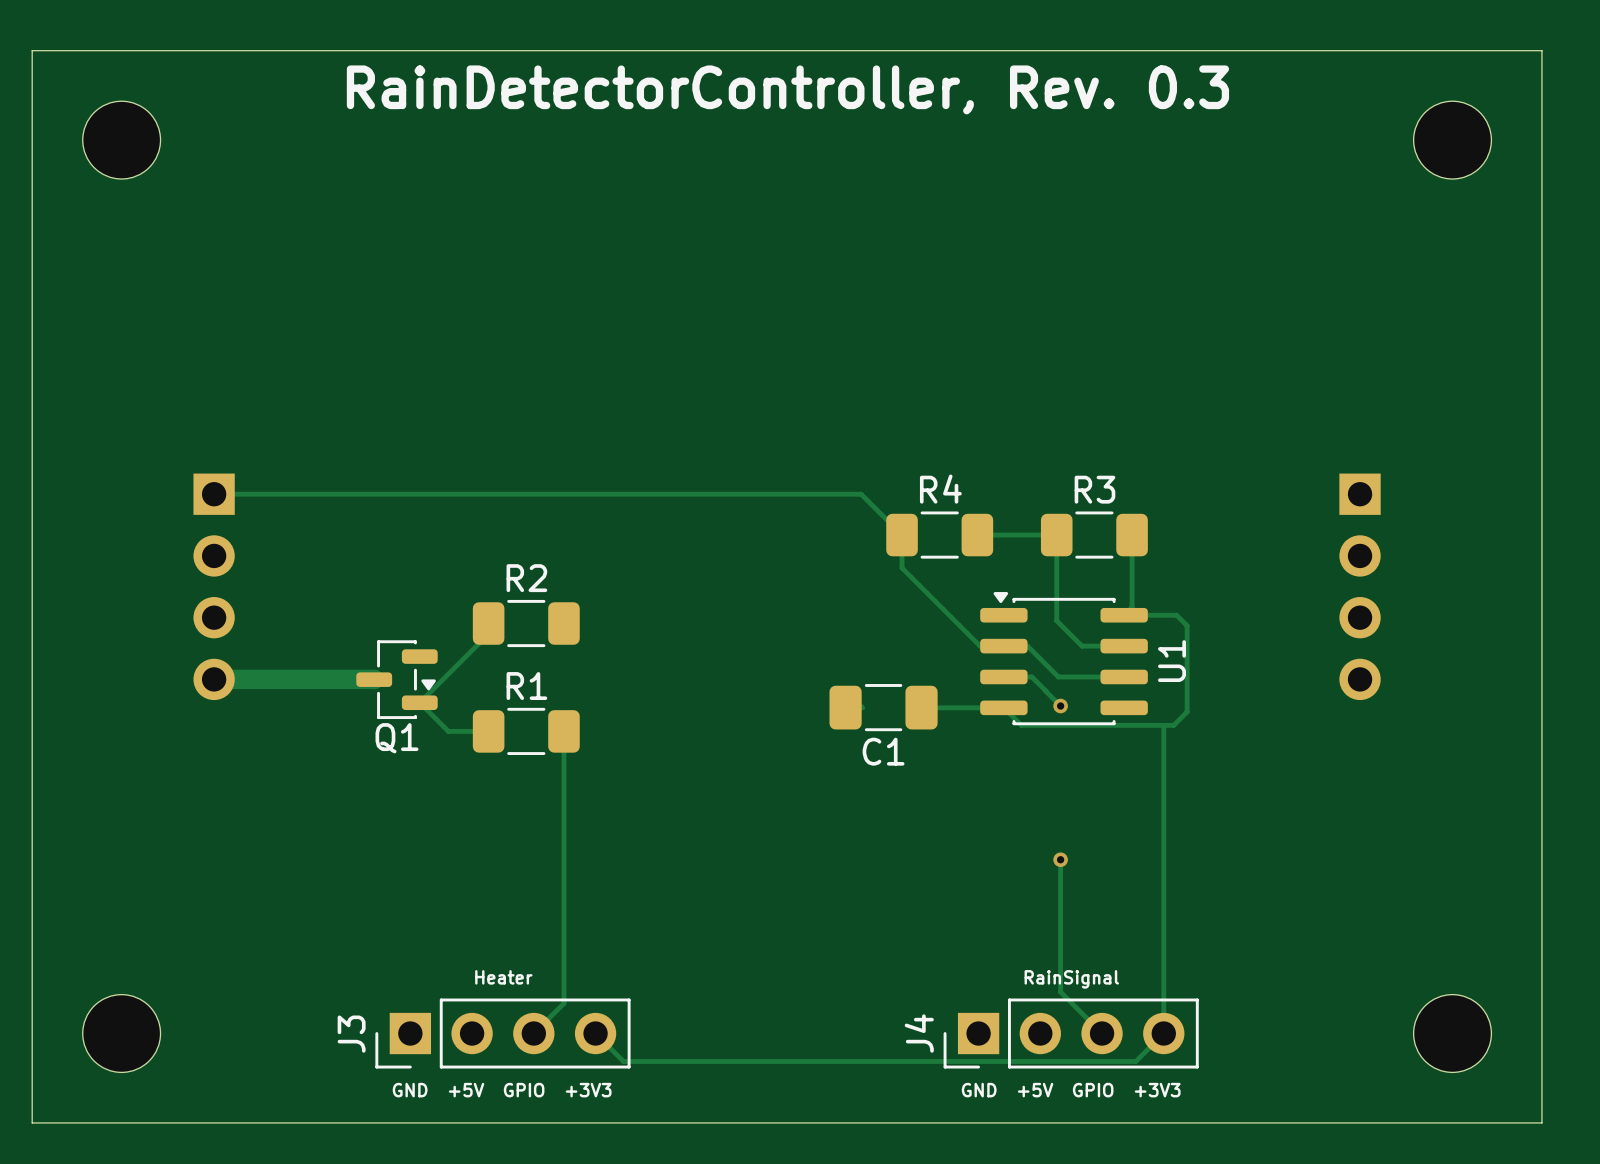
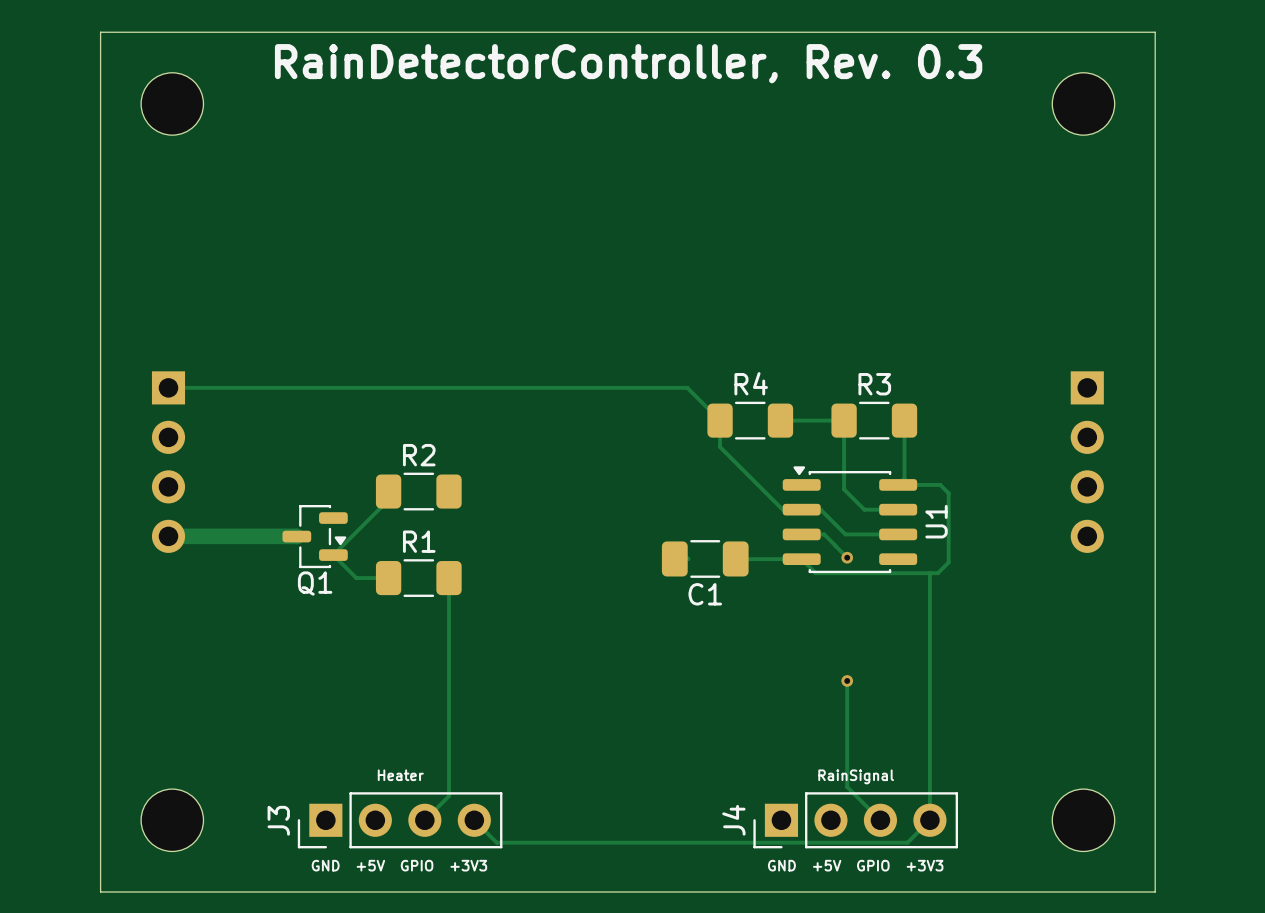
board edge: (129, 50) (32, 50) (32, 1122) (129, 1122) -> (100, 32) (100, 892)
board edge: (1444, 50) (1541, 50) (1541, 1122) (1444, 1122) -> (1155, 32) (1155, 892)
part position: (121, 140) -> (172, 103)
part position: (1452, 140) -> (1083, 103)
part position: (121, 1033) -> (172, 820)
part position: (1452, 1033) -> (1083, 820)

